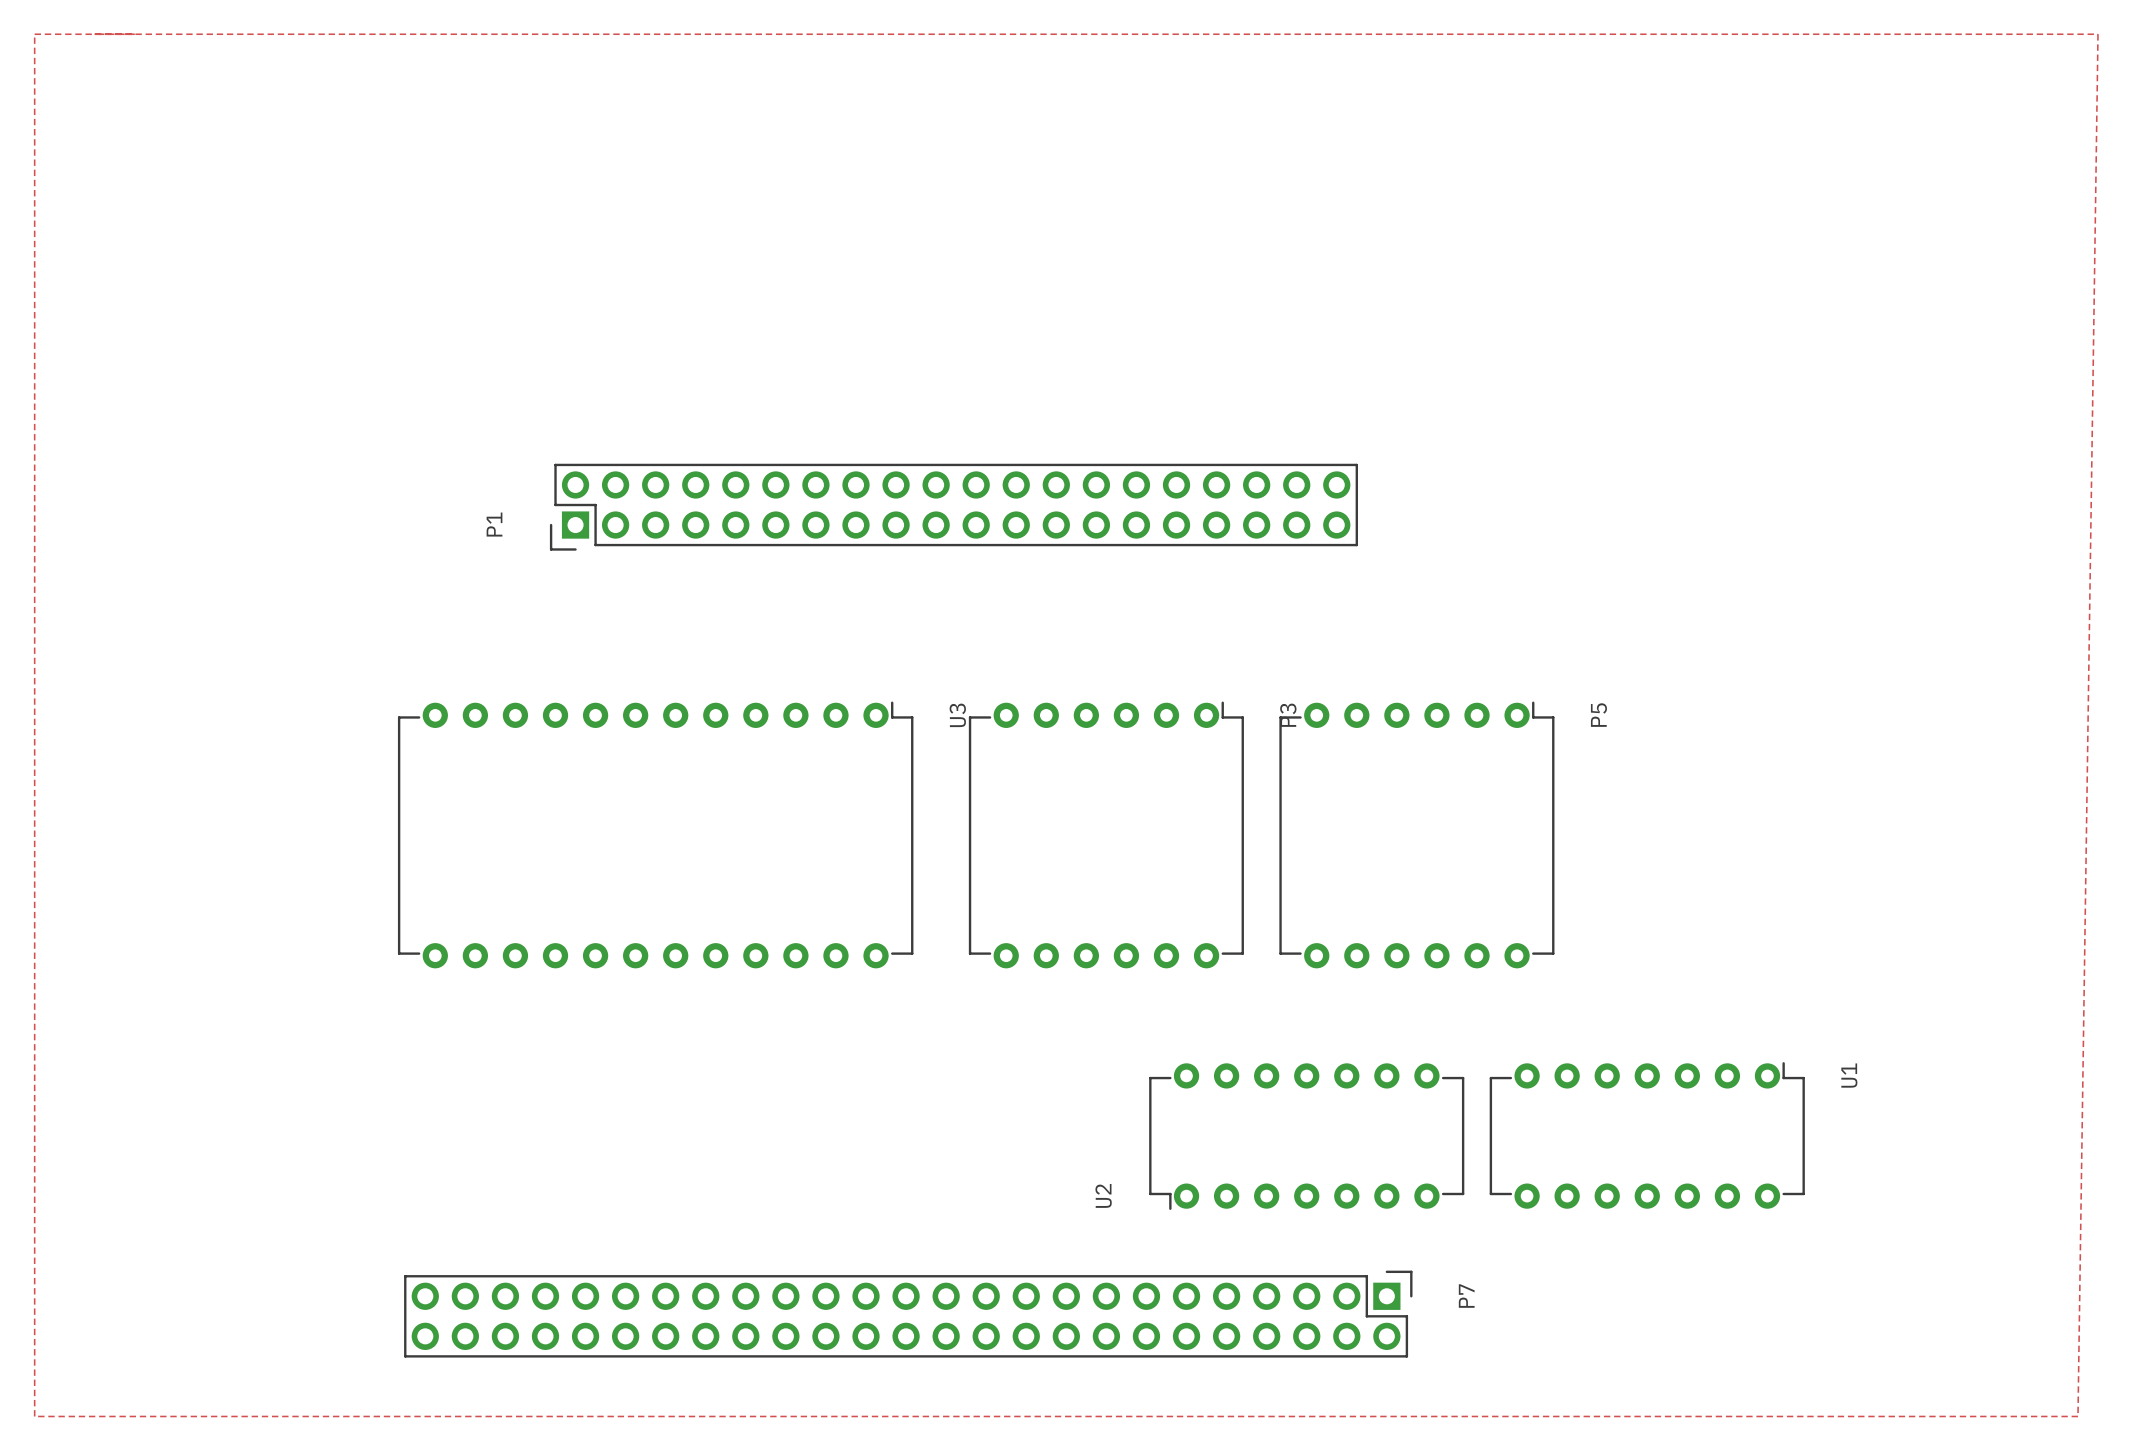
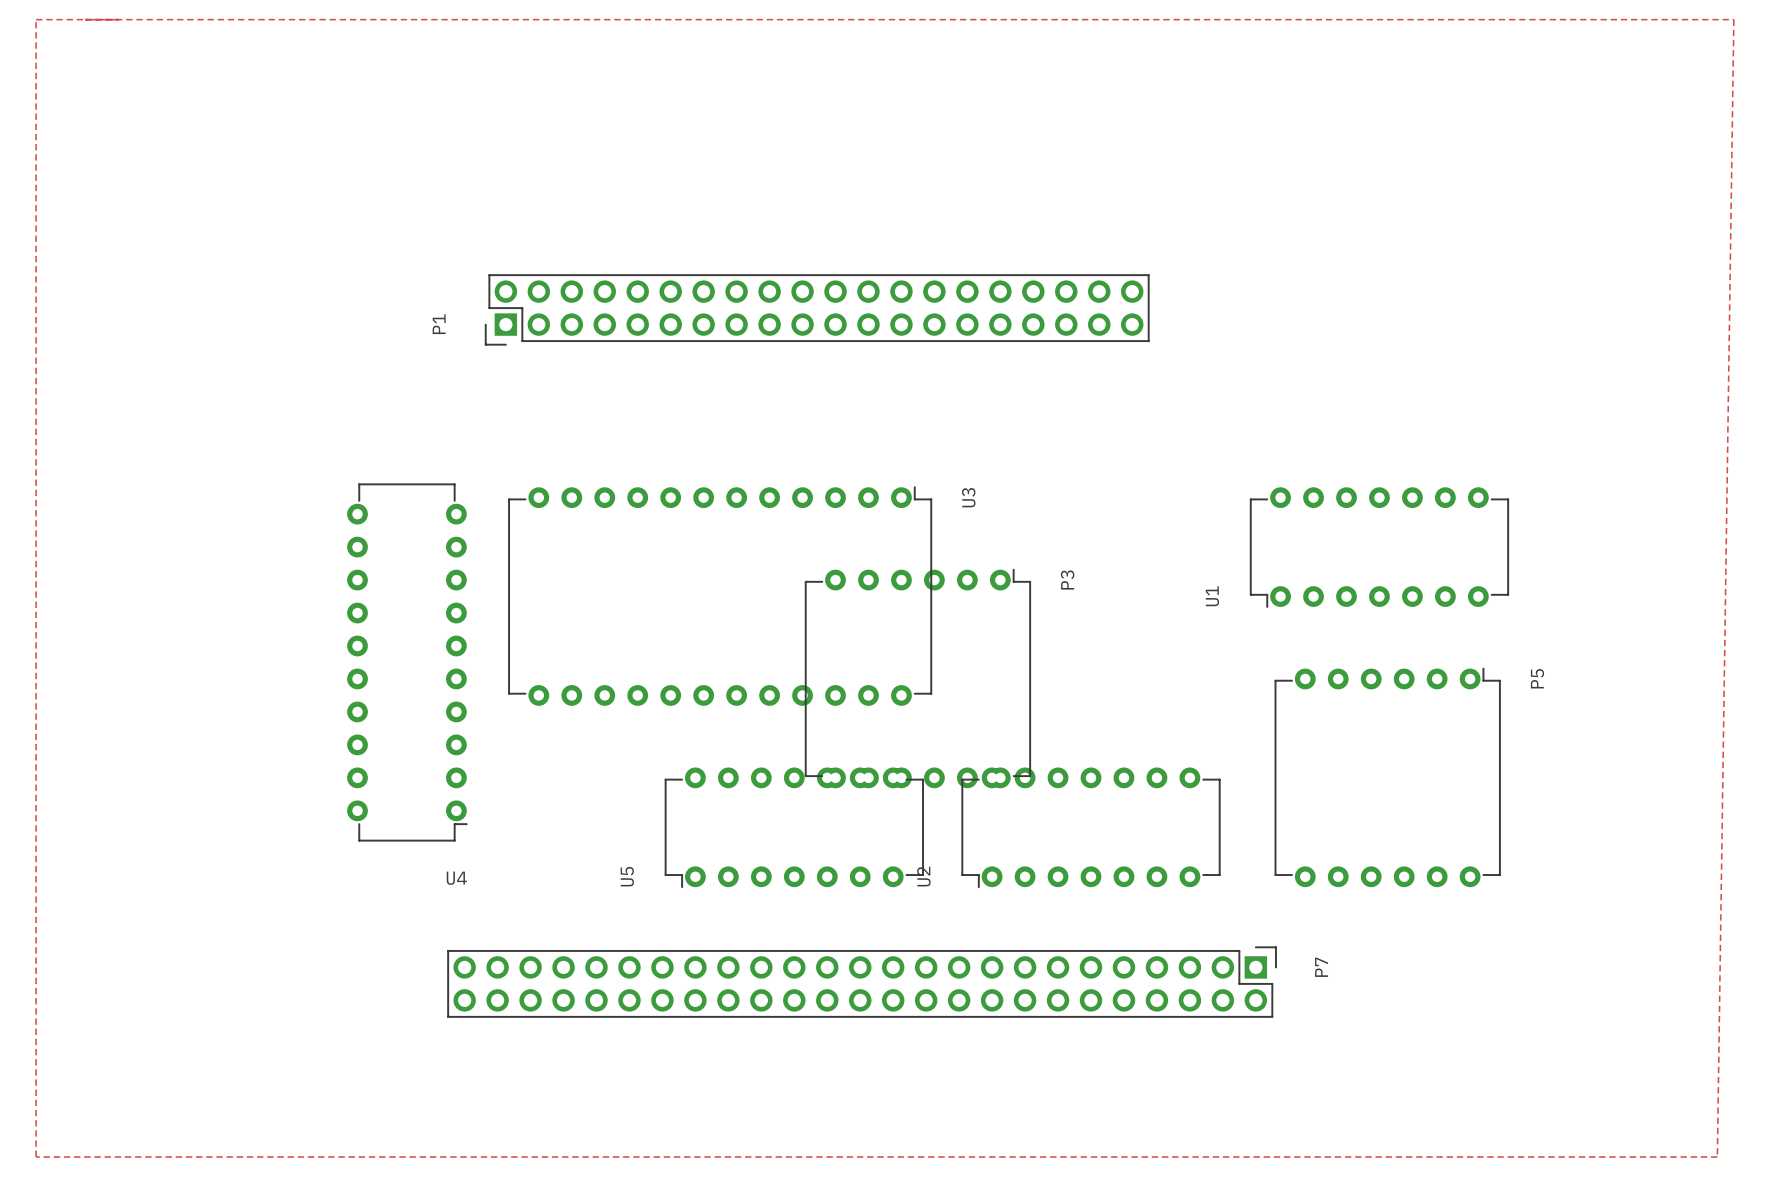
P1 position: (953, 507) -> (817, 309)
U4: none -> (407, 662)
U3 position: (655, 834) -> (720, 596)
P5 position: (1416, 834) -> (1387, 777)
U5: none -> (794, 827)
U1 rotation: 0° (1647, 1135) -> 180° (1379, 547)
U1 position: (1647, 1135) -> (1379, 547)
U2 position: (1306, 1136) -> (1091, 827)
P7 position: (908, 1314) -> (862, 982)

